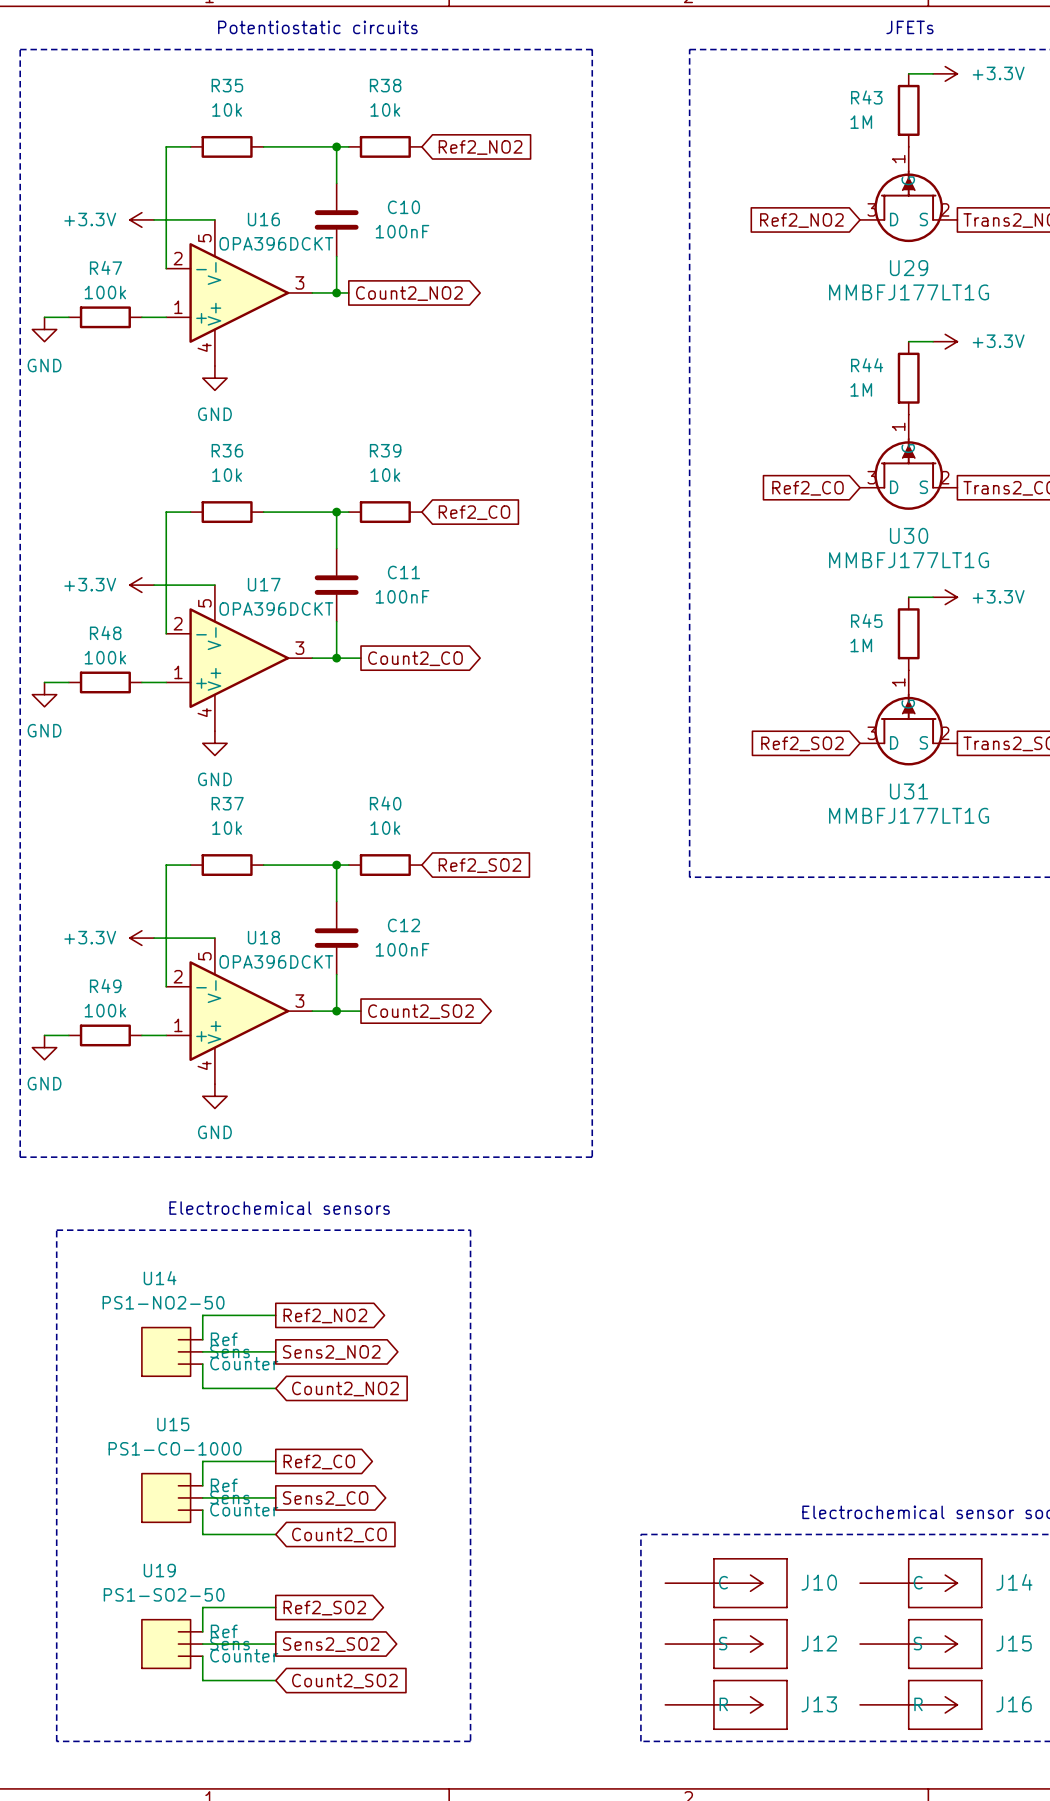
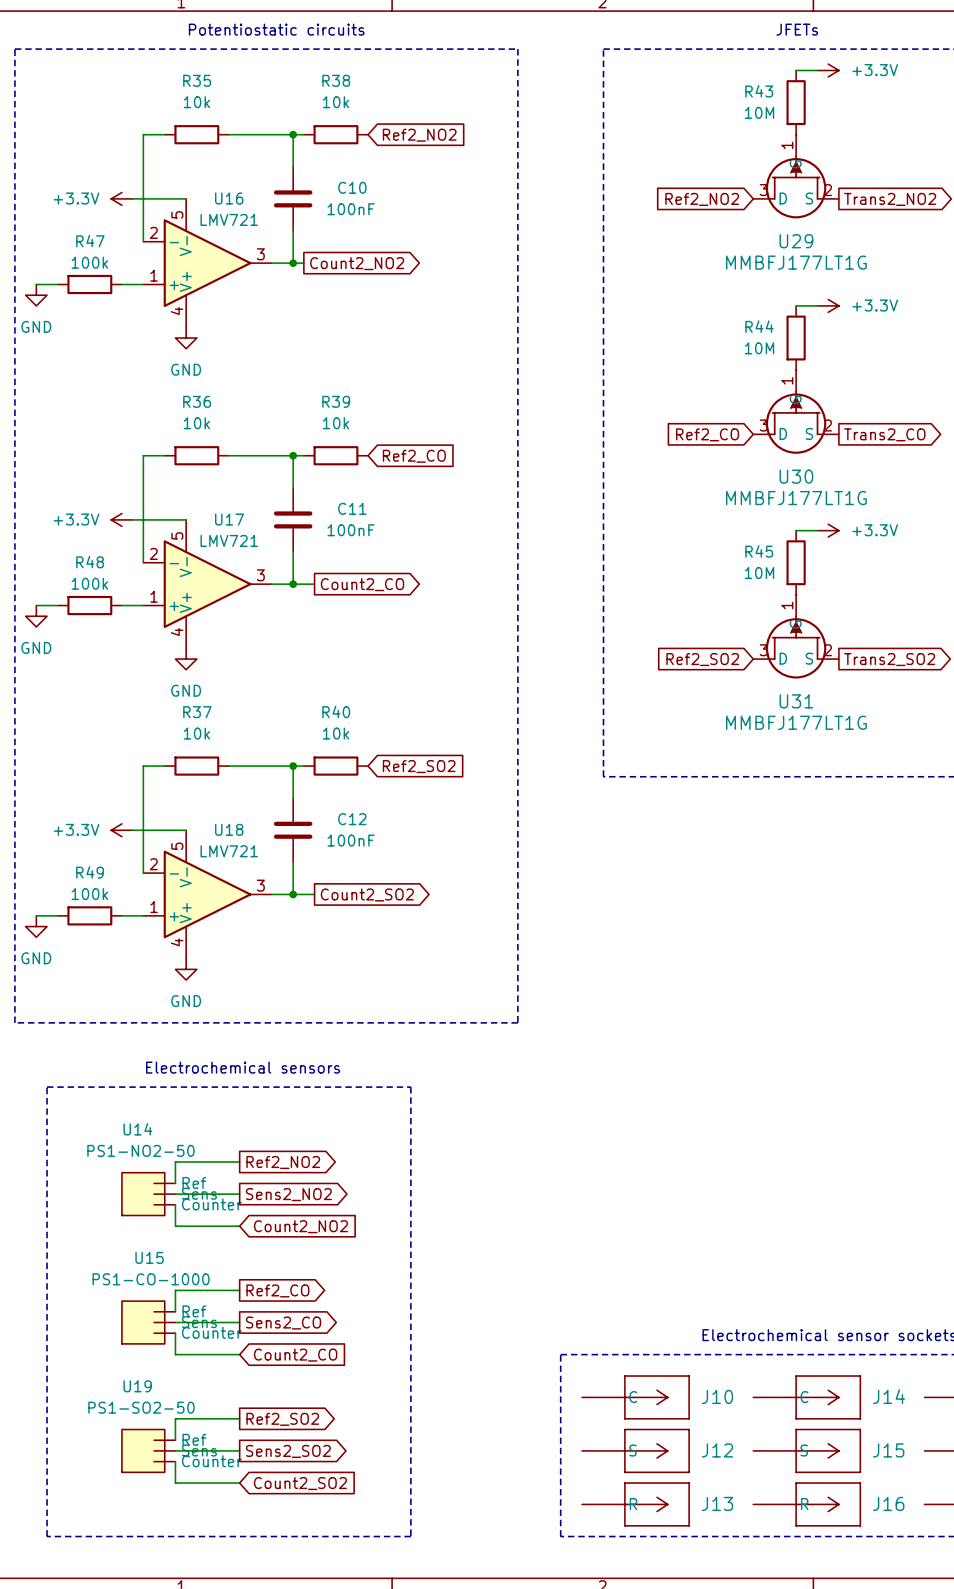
R43 value: 1M (861, 122) -> 10M (759, 112)
U16 value: OPA396DCKT (276, 243) -> LMV721 (229, 219)
R44 value: 1M (861, 389) -> 10M (759, 348)
U17 value: OPA396DCKT (276, 608) -> LMV721 (229, 540)
R45 value: 1M (861, 645) -> 10M (759, 573)
U18 value: OPA396DCKT (276, 961) -> LMV721 (229, 851)

